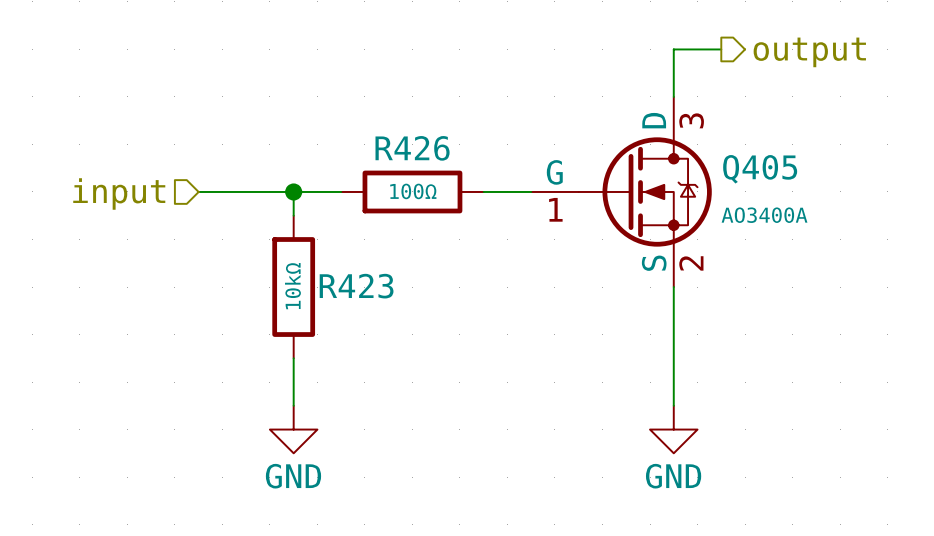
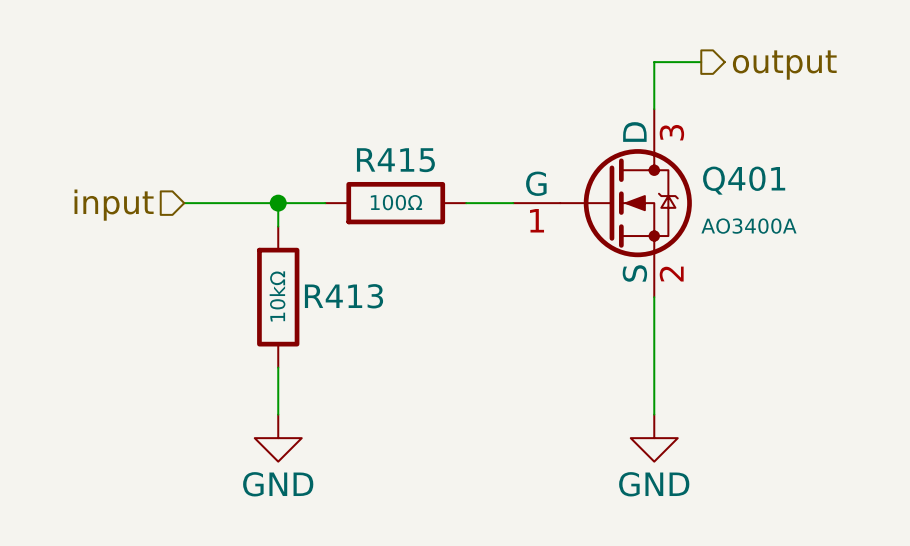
R426 name: R426 (412, 148) -> R415 (395, 160)
Q405 name: Q405 (760, 169) -> Q401 (744, 180)
R423 name: R423 (356, 286) -> R413 (343, 296)

